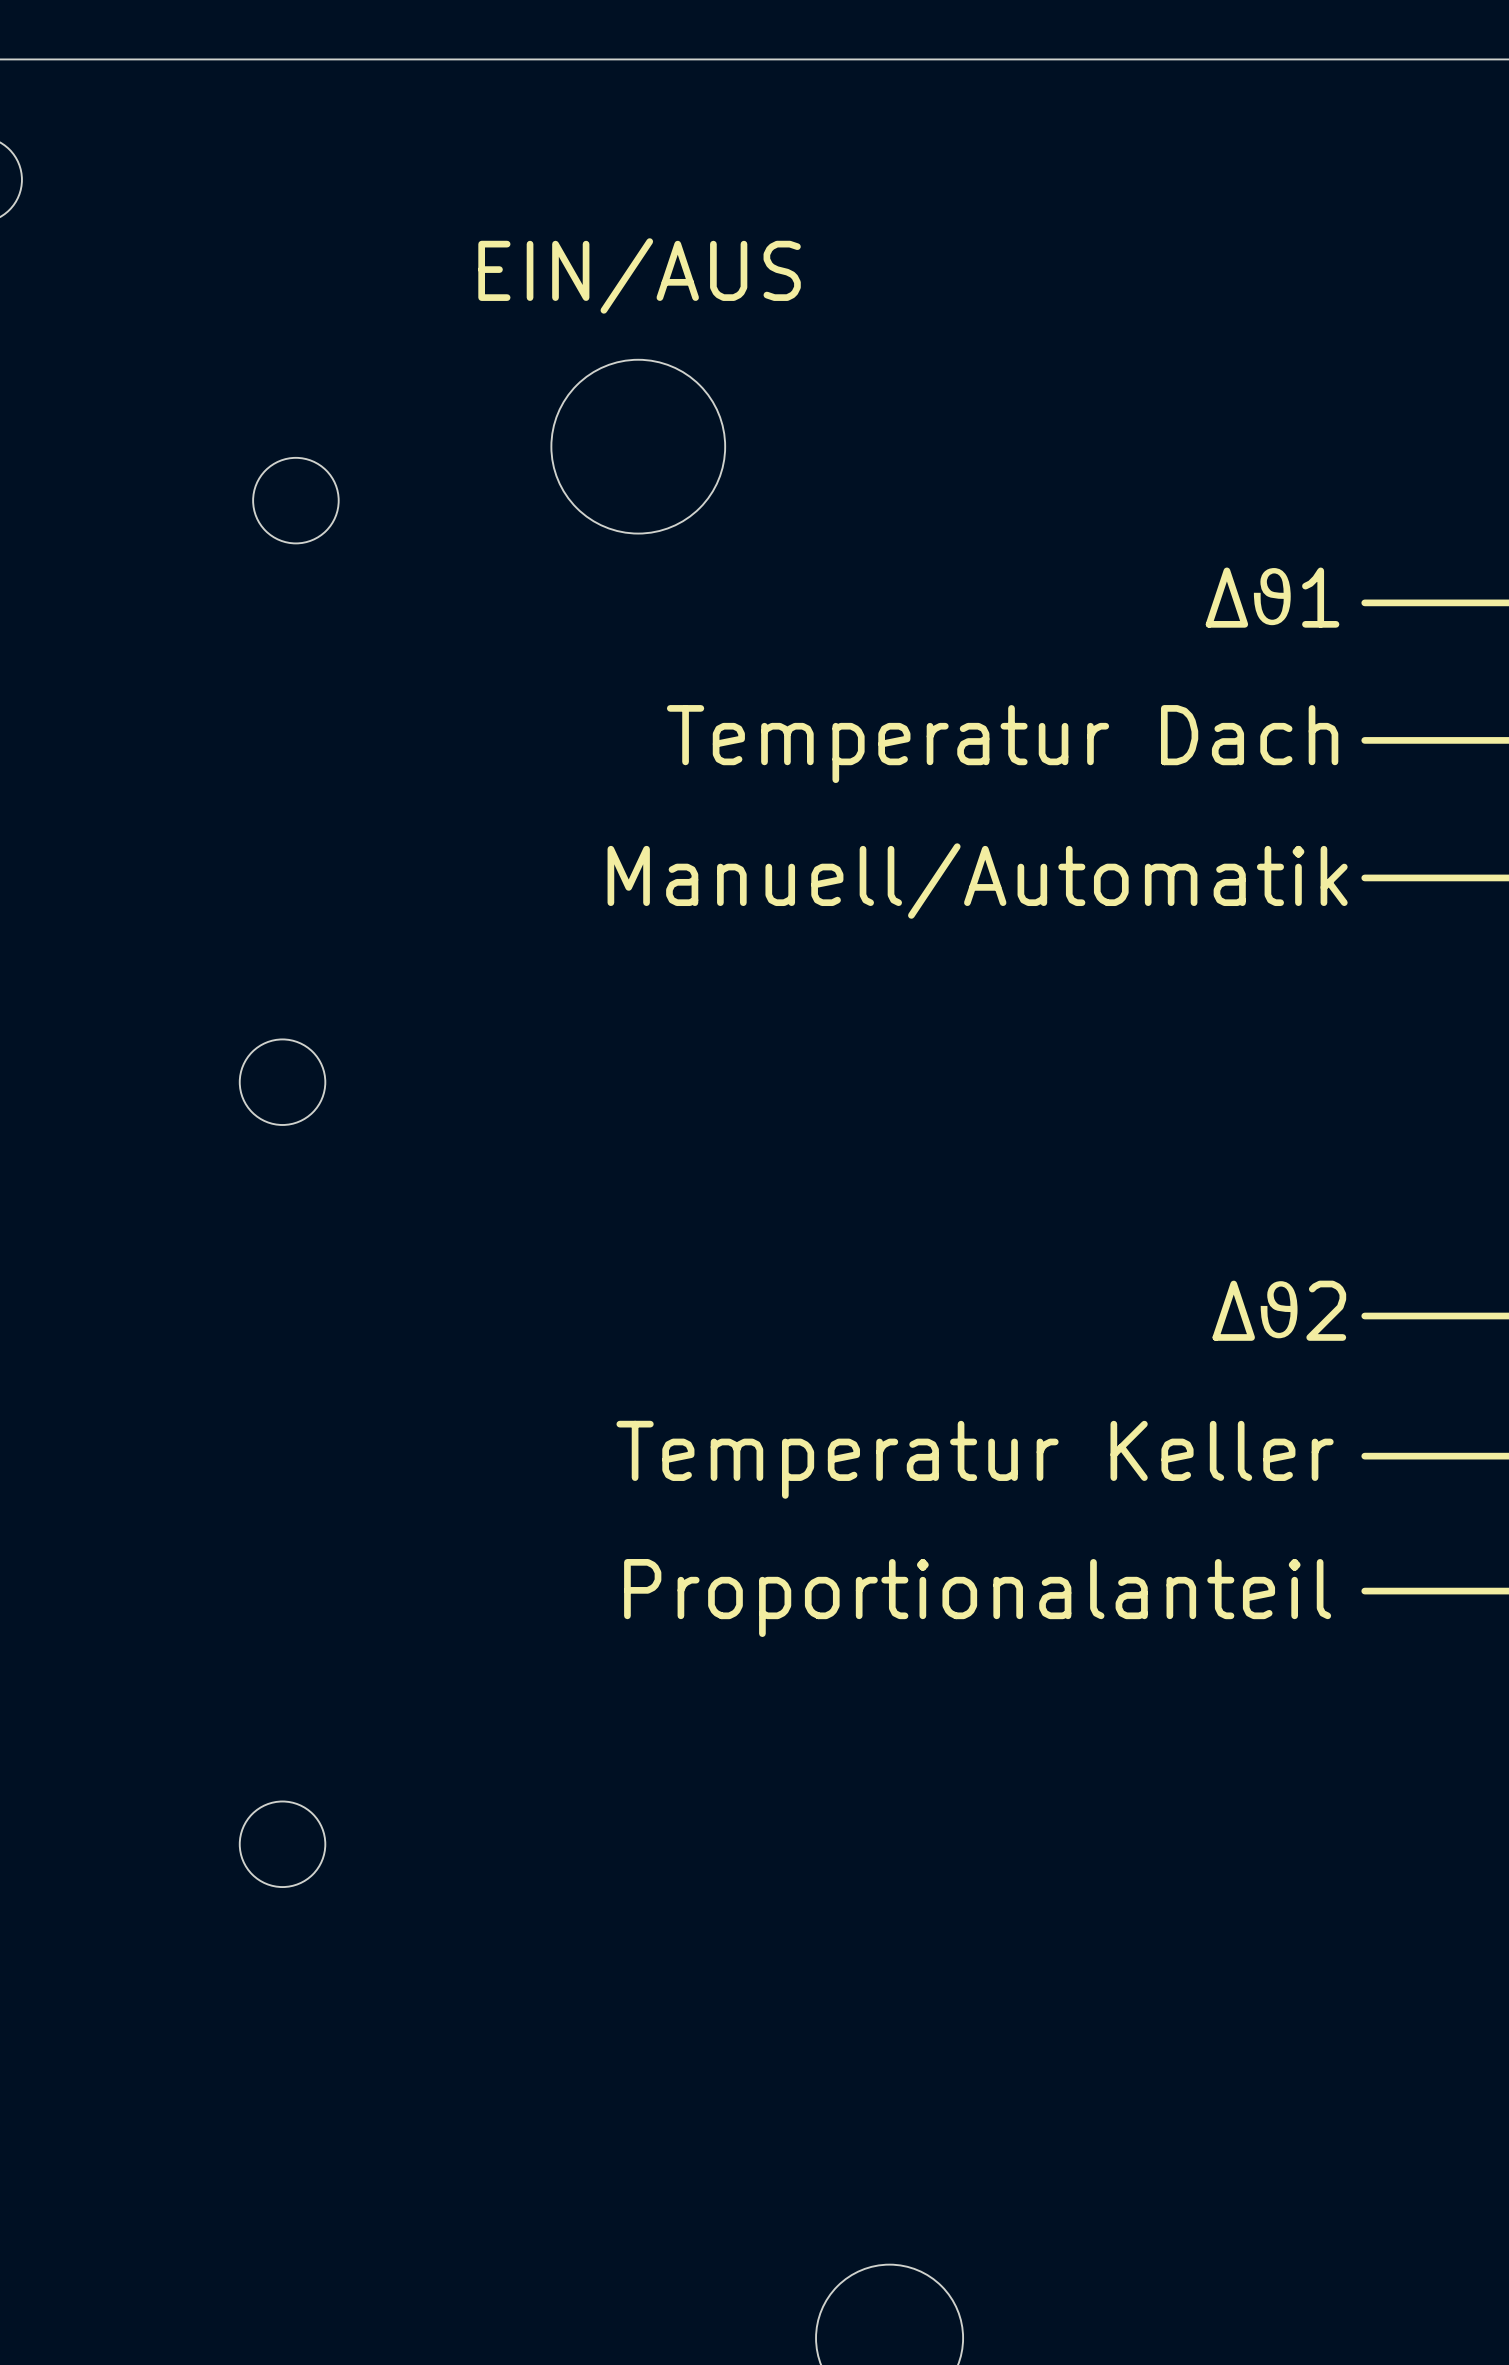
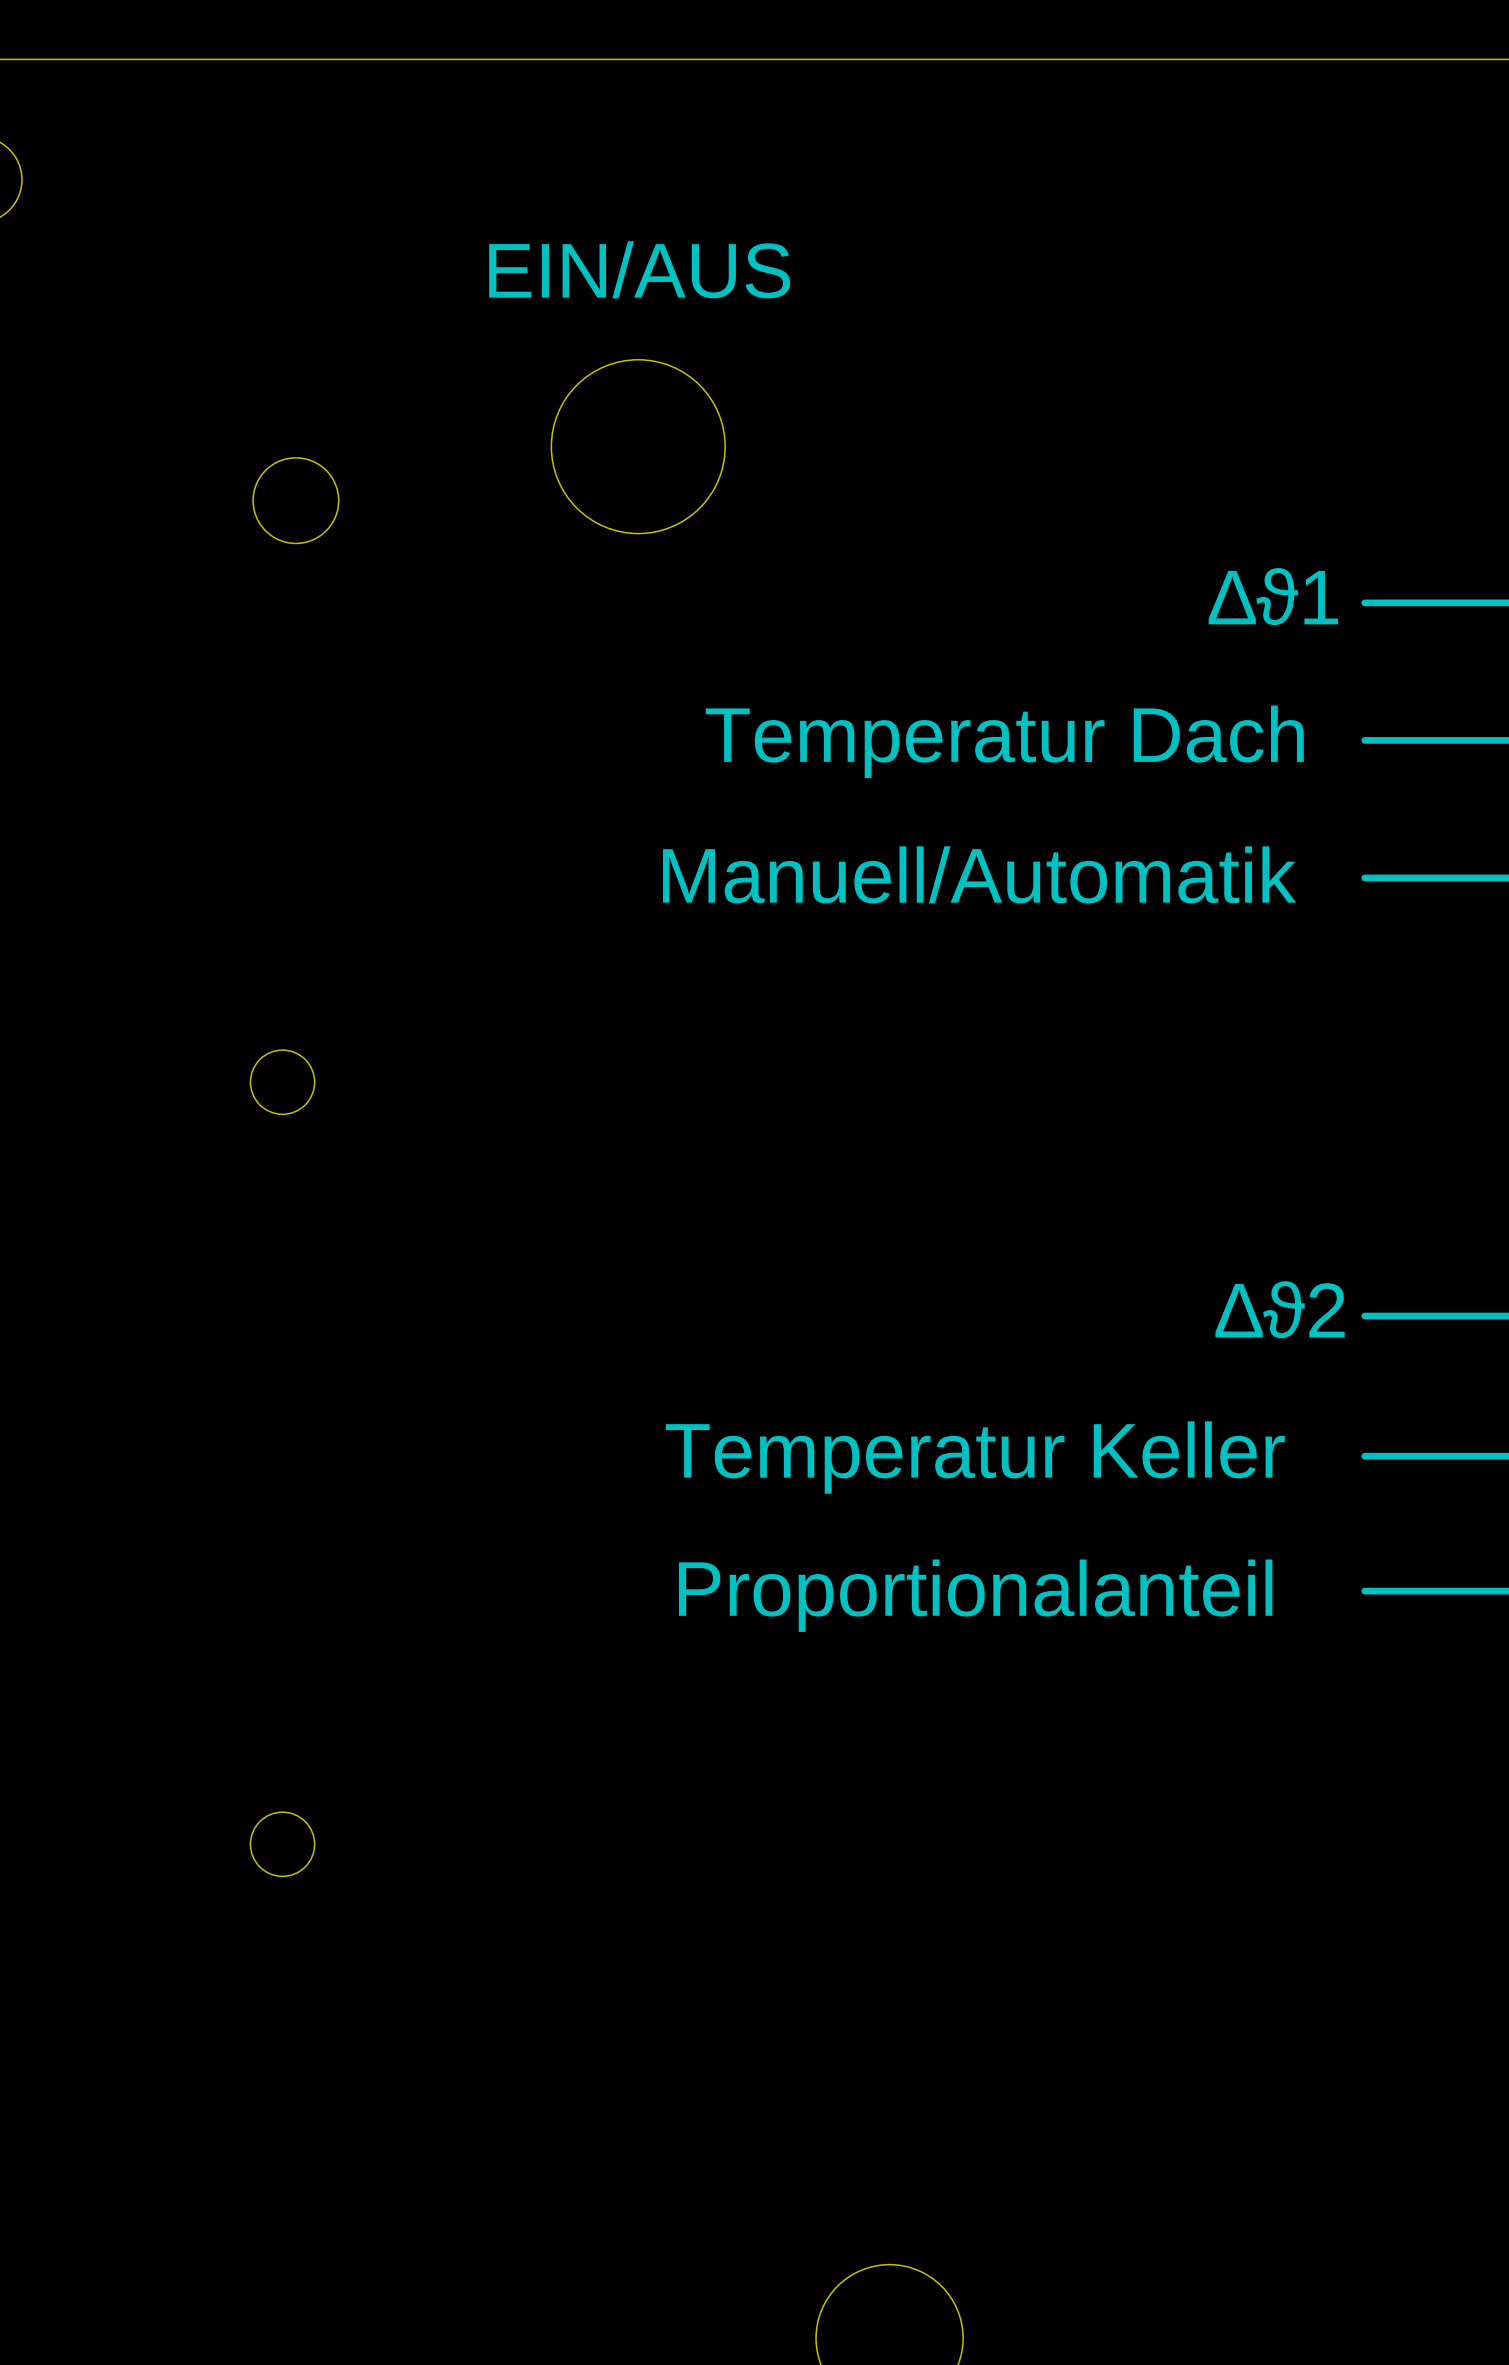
round board edge size: [239, 1038, 326, 1126] -> [249, 1049, 316, 1115]
round board edge size: [239, 1800, 326, 1888] -> [249, 1811, 316, 1878]

